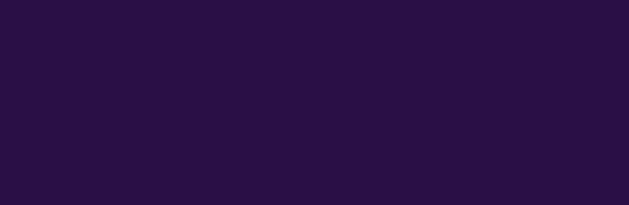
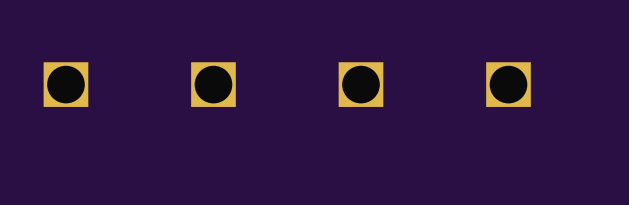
part: none -> (65, 84)
part: none -> (213, 84)
part: none -> (360, 84)
part: none -> (508, 84)

